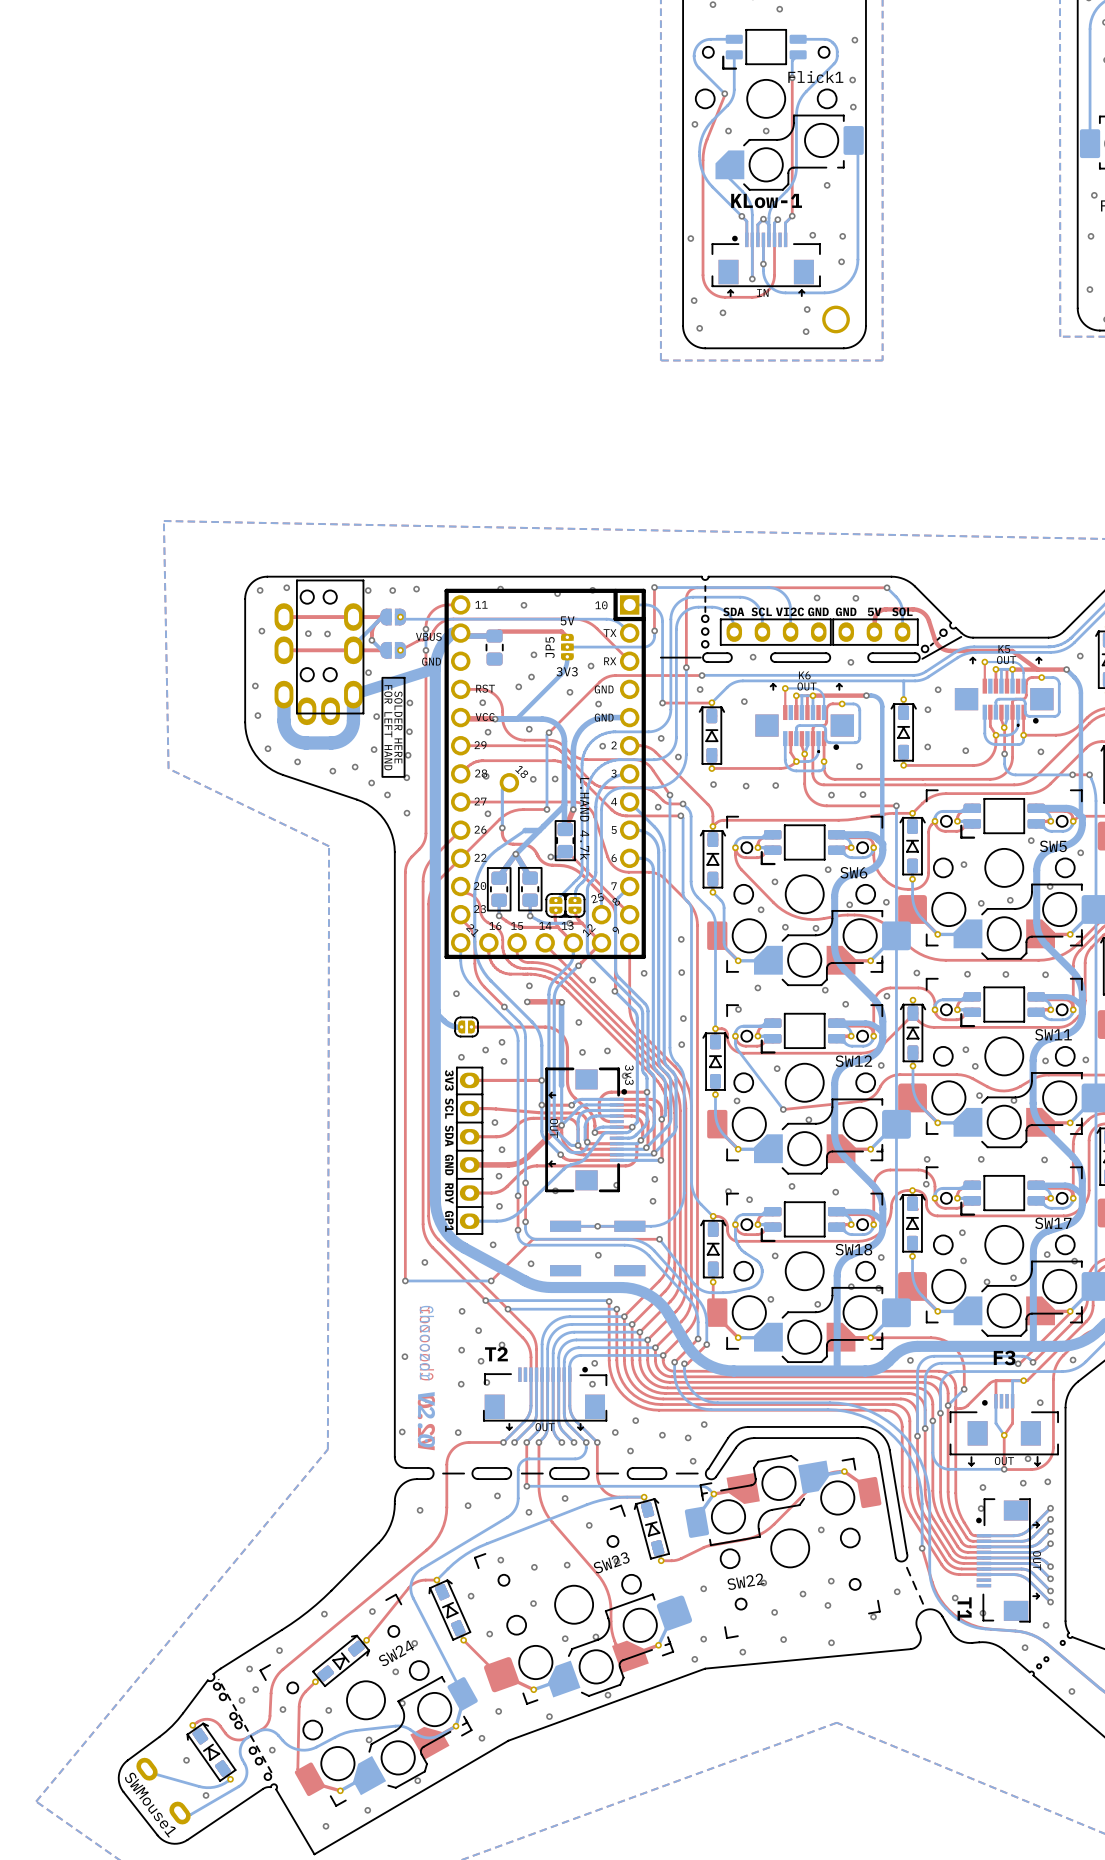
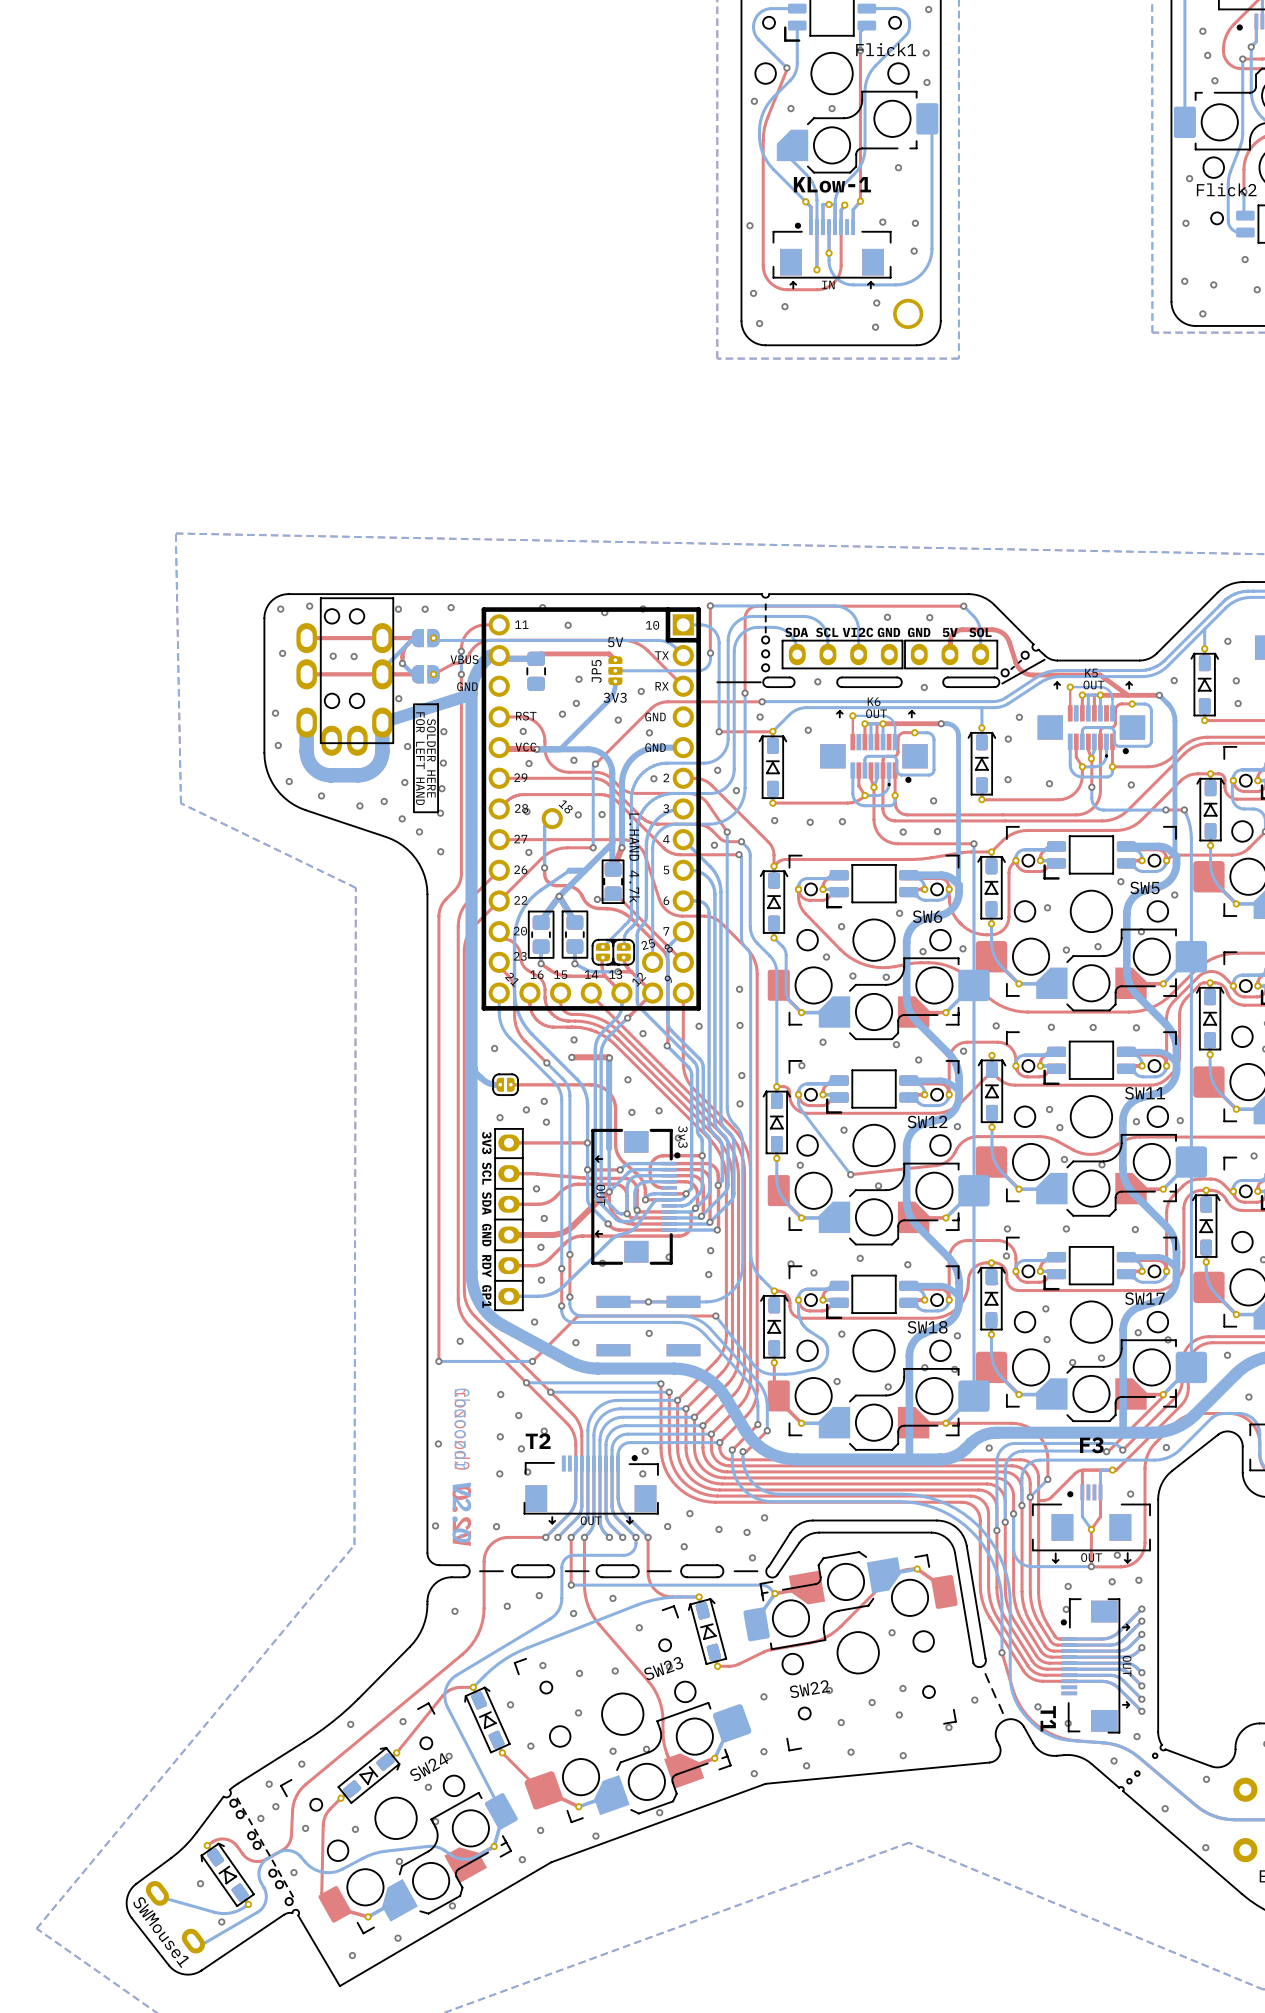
via: (741, 216) -> none
bottom track: (792, 216) (785, 222) (785, 239) -> none
via: (792, 216) -> none
via: (763, 219) -> none
bottom track: (777, 219) (774, 222) (774, 239) -> none
via: (777, 219) -> none
bottom track: (768, 224) (763, 219) (757, 224) (757, 239) -> none
KLow-1 footprint: [711, 232, 821, 297] -> [772, 197, 892, 290]
bottom track: (752, 239) (752, 279) -> none
bottom track: (763, 239) (763, 263) -> none
via: (763, 264) -> none
via: (752, 279) -> none

